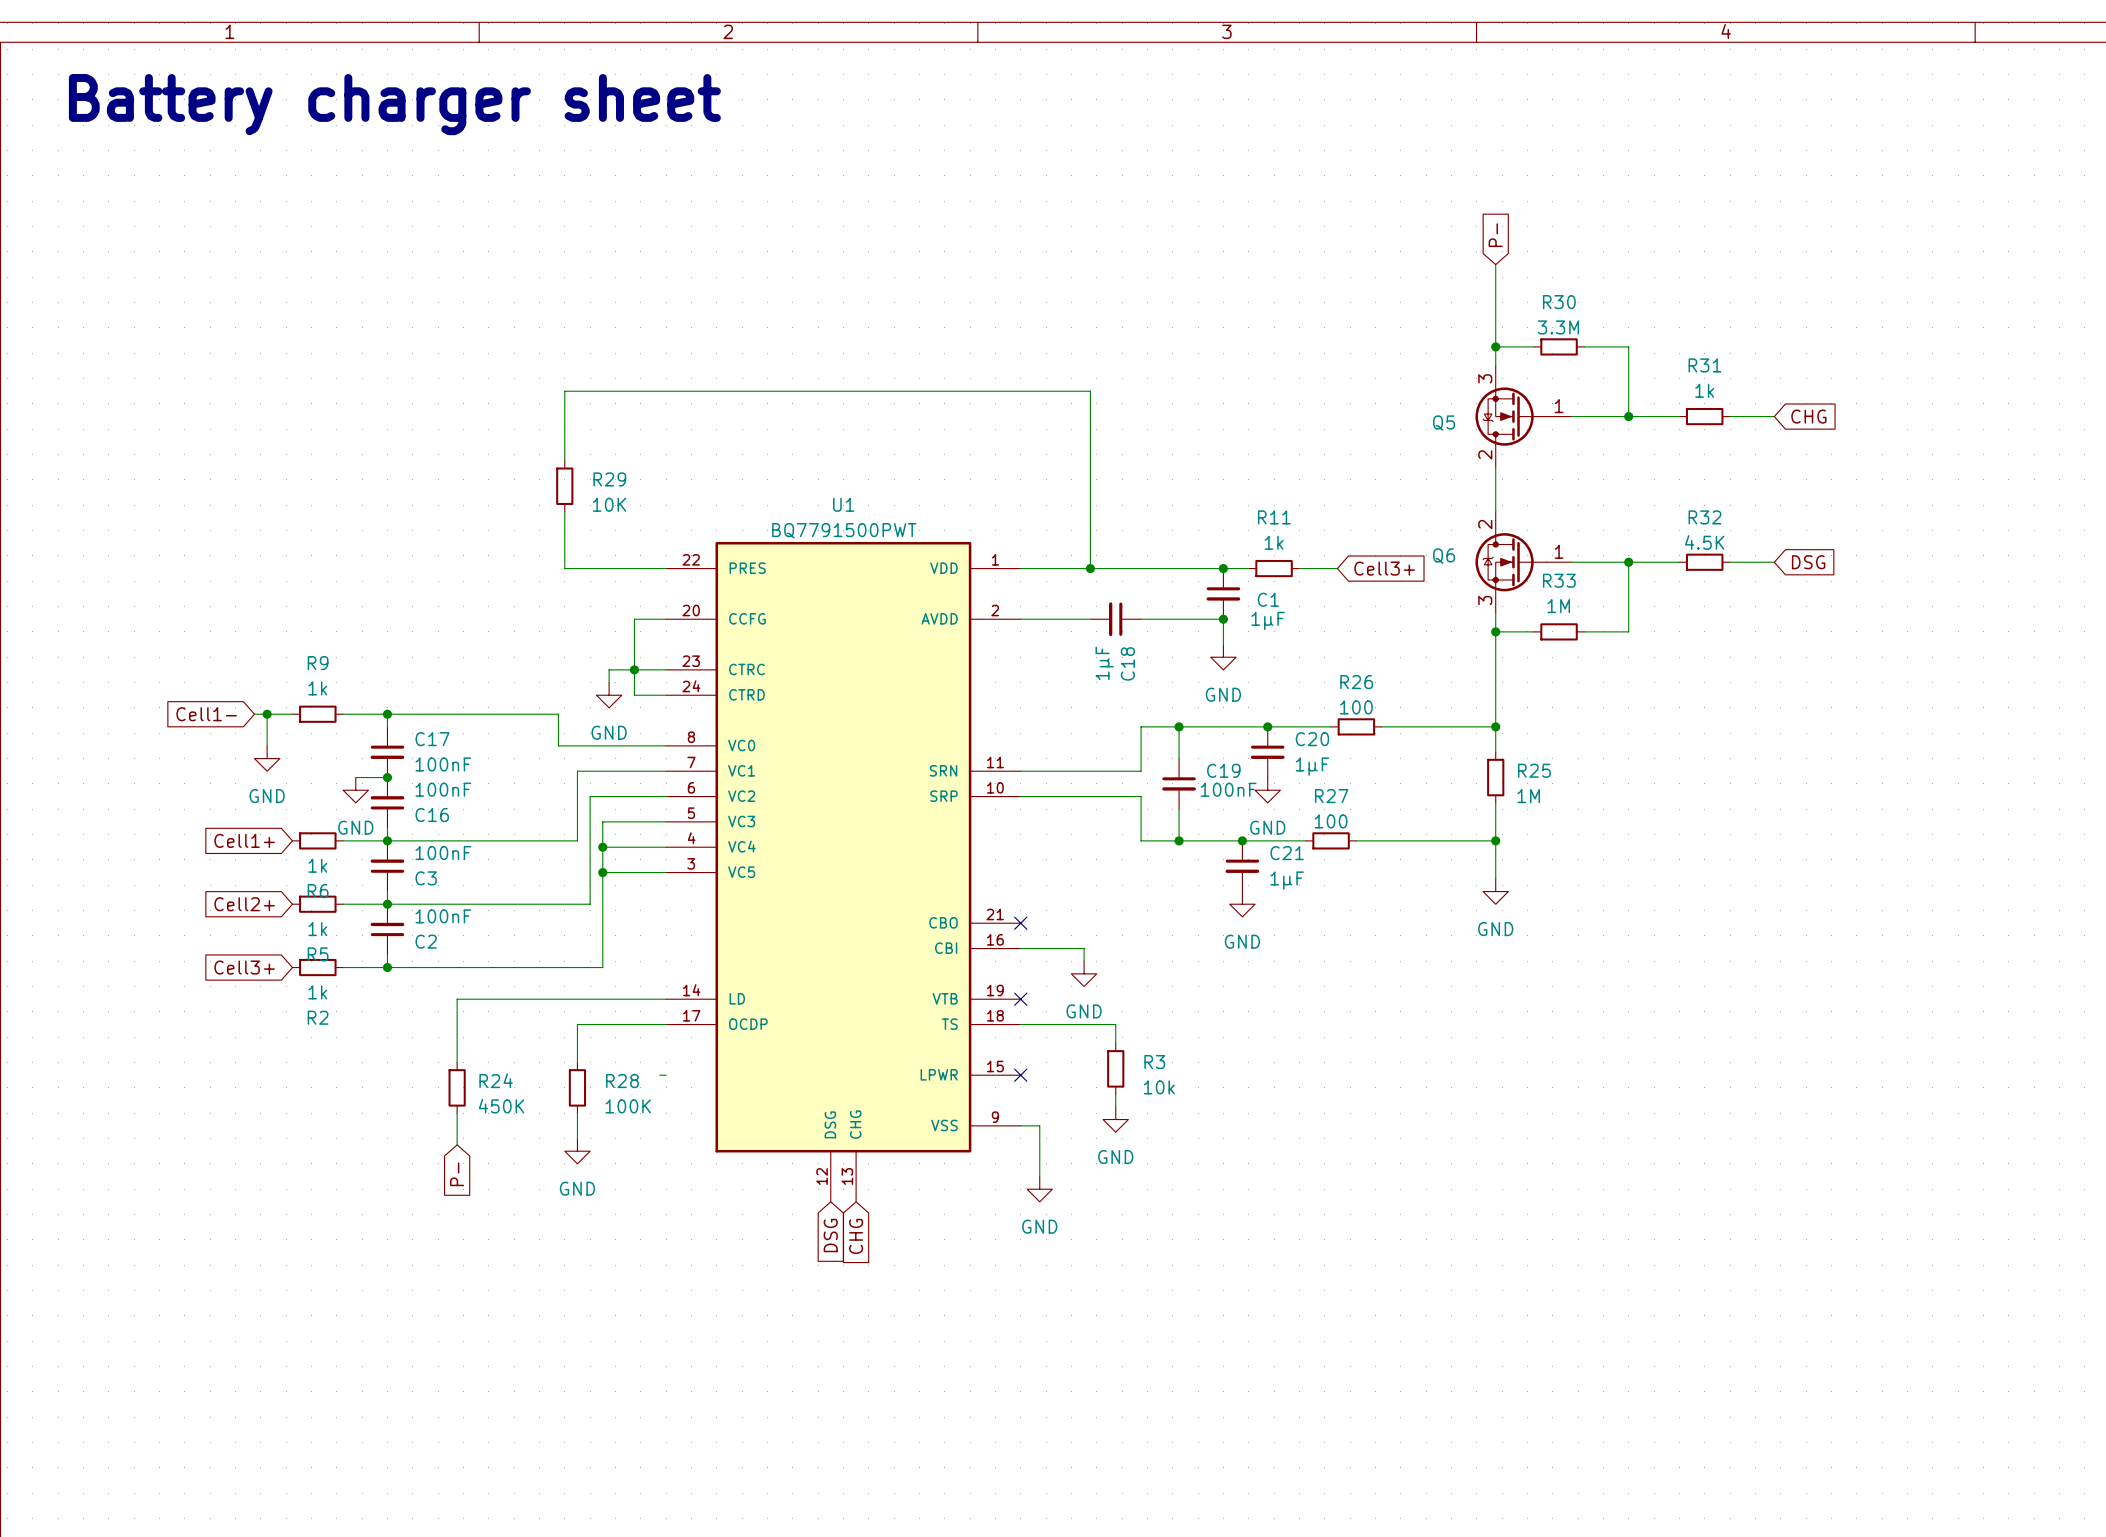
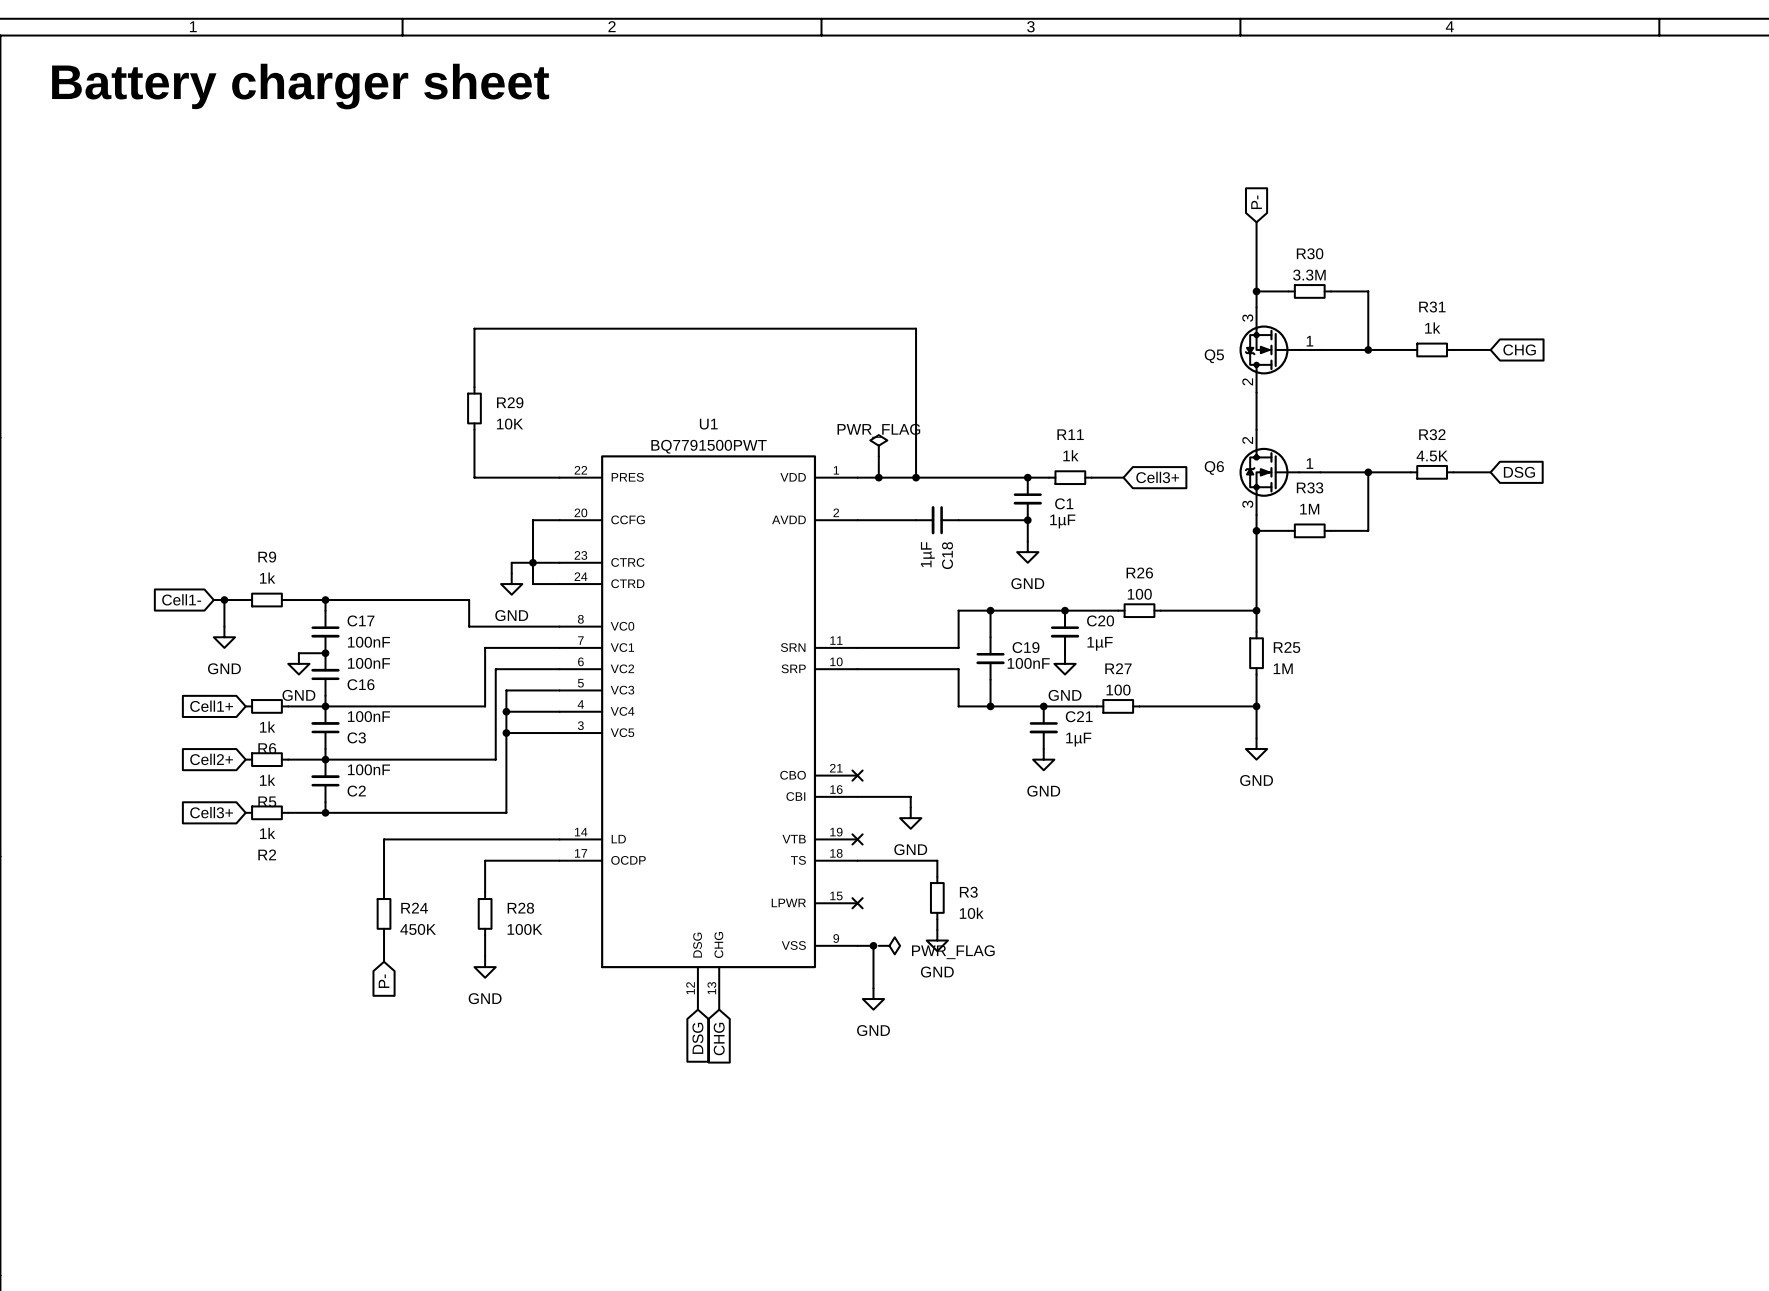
power symbol: none -> PWR_FLAG (878, 445)
wire: none -> (878, 456) (878, 477)
junction: none -> (878, 477)
wire: (659, 1075) (666, 1075) -> none
junction: none -> (873, 945)
power symbol: none -> PWR_FLAG (889, 945)

